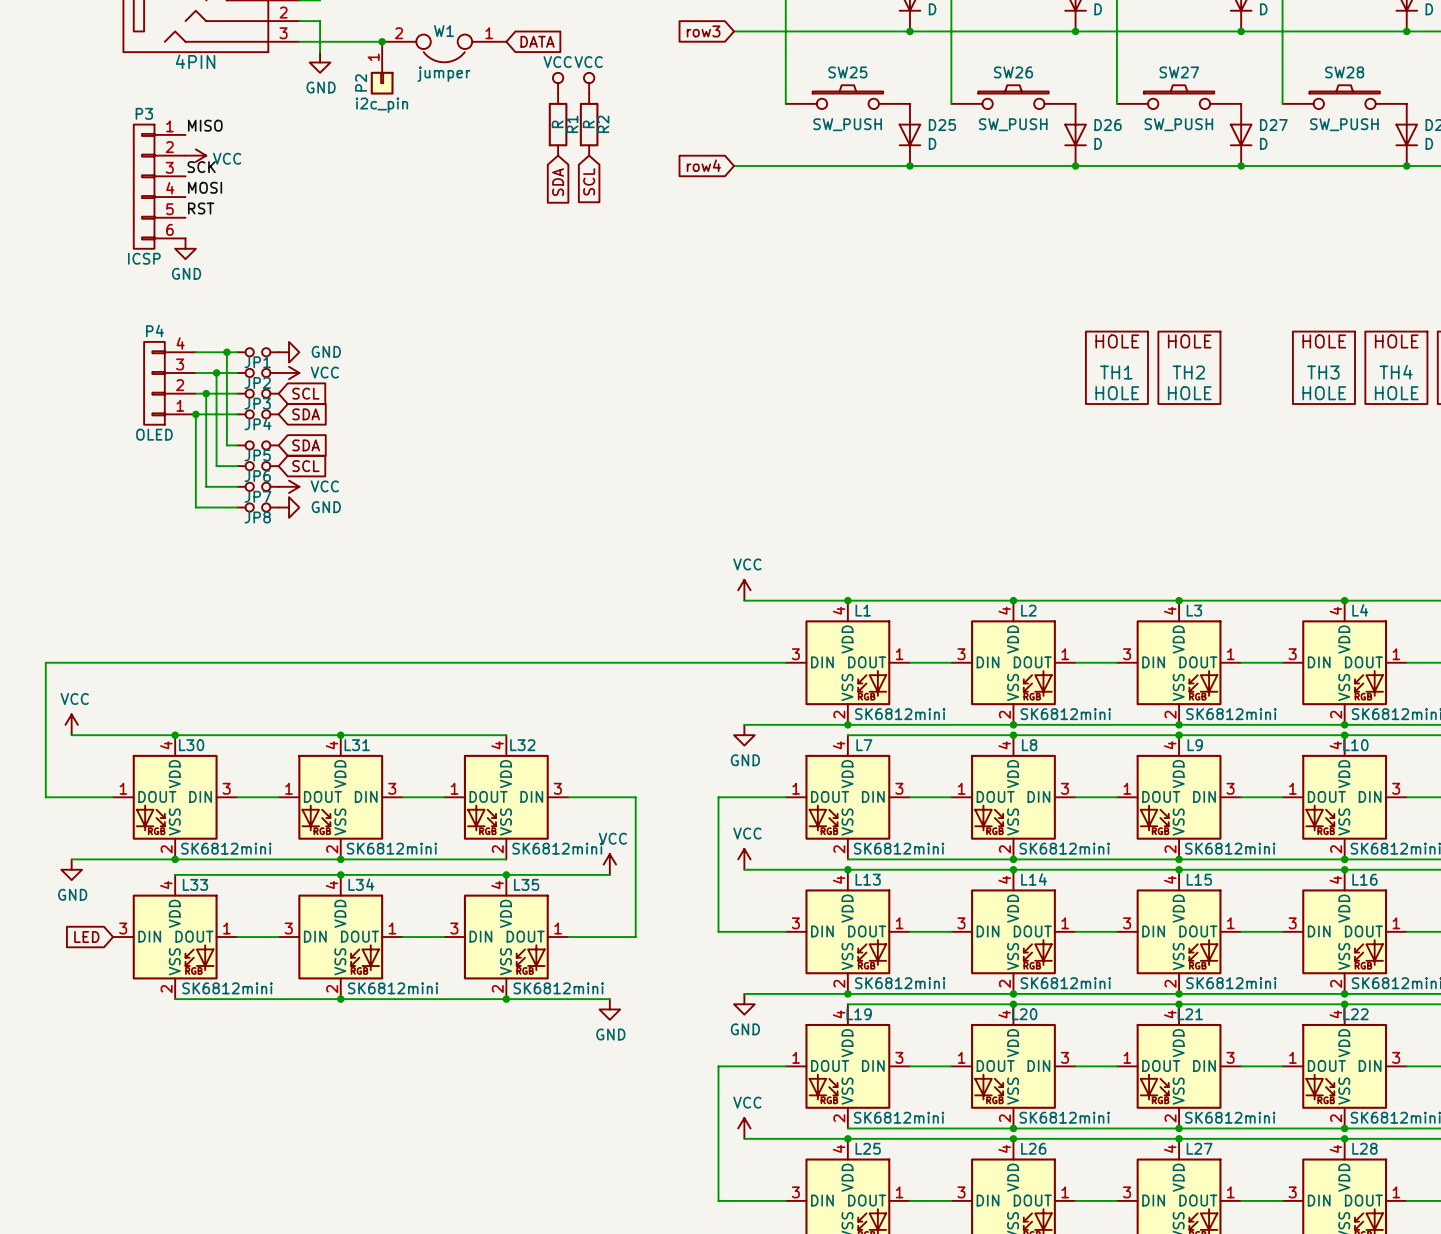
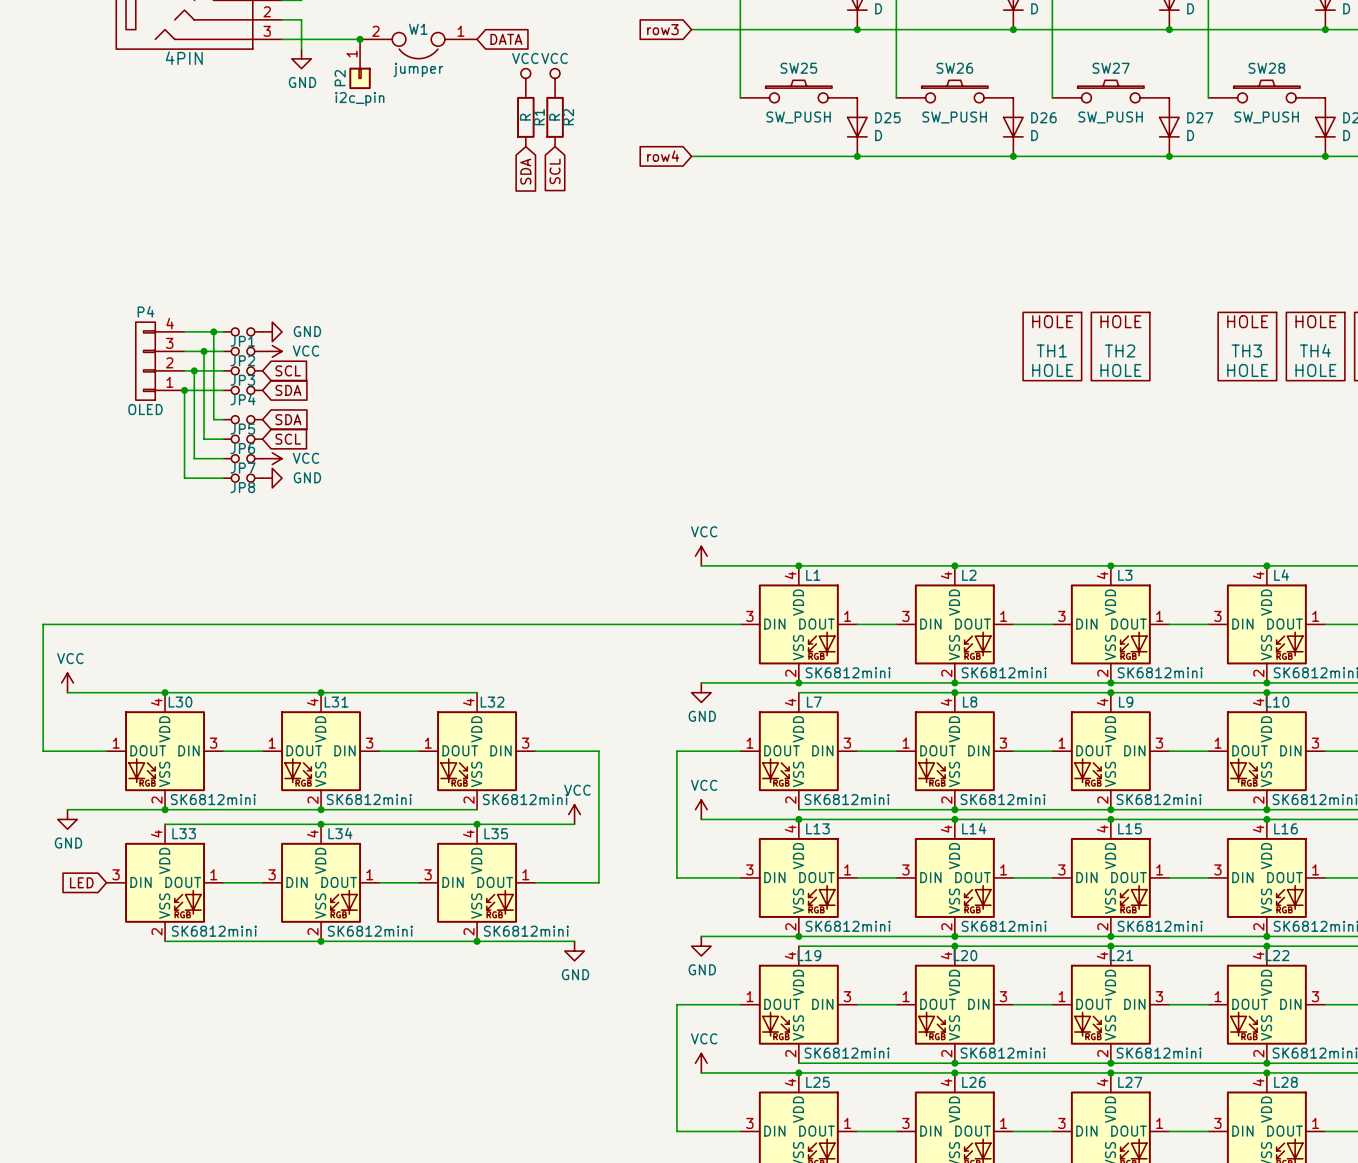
label: MISO (205, 125) -> none
power symbol: VCC (195, 155) -> none
label: SCK (201, 167) -> none
P3: ICSP (159, 186) -> none
label: MOSI (205, 187) -> none
label: RST (201, 208) -> none
power symbol: GND (185, 248) -> none

